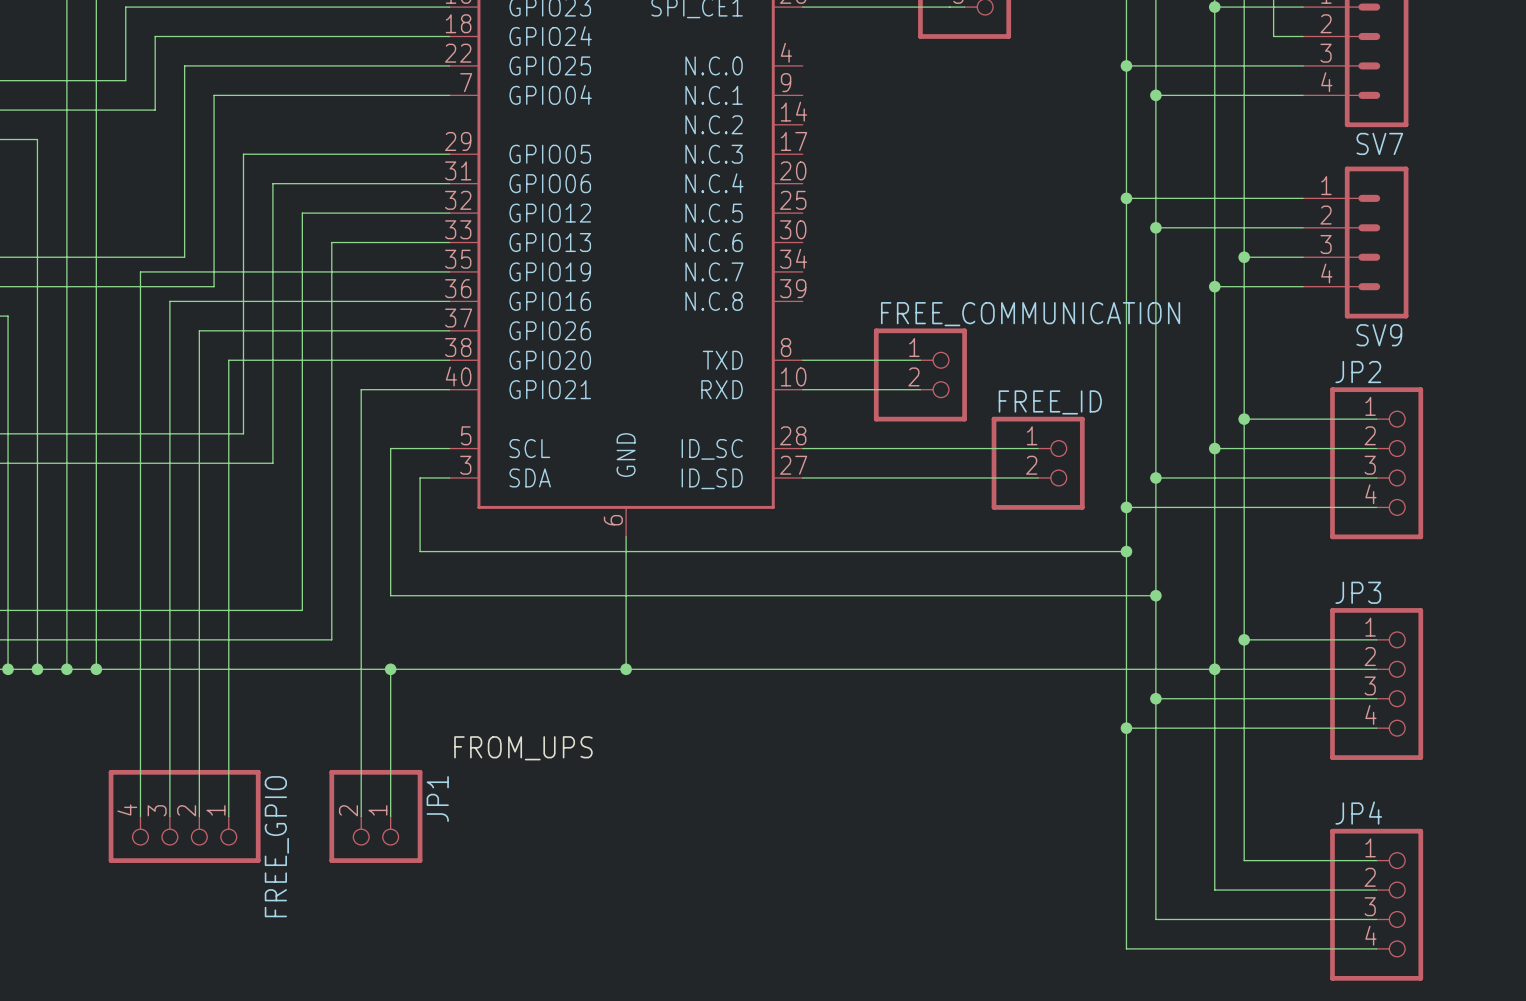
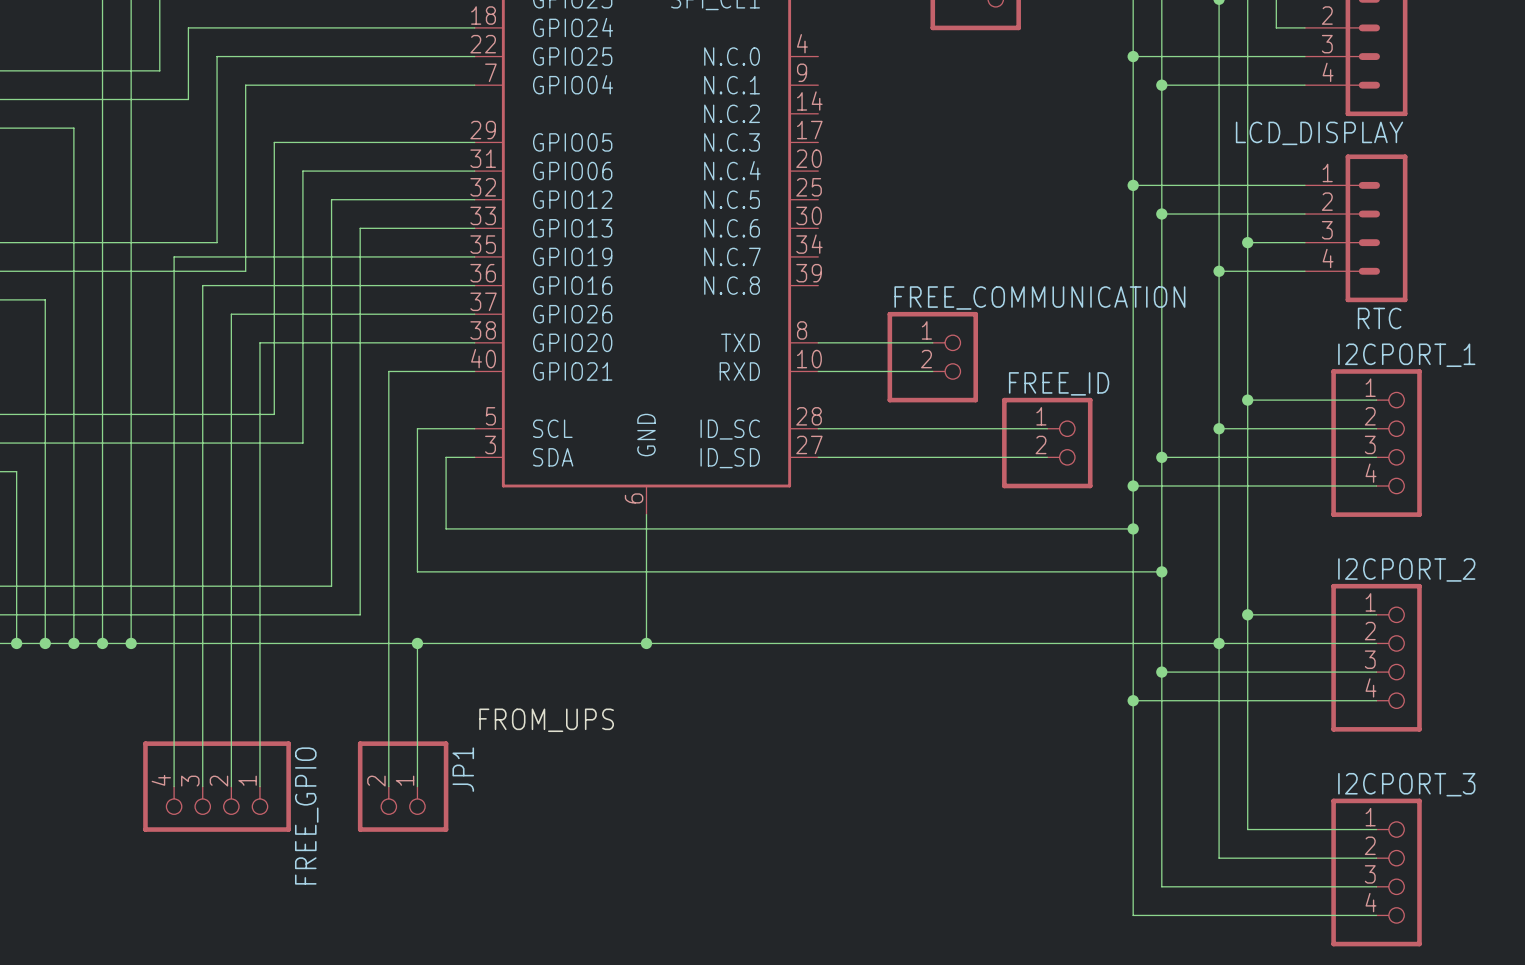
SV7 name: SV7 (1379, 143) -> LCD_DISPLAY (1319, 133)
SV9 name: SV9 (1379, 335) -> RTC (1379, 318)
JP2 name: JP2 (1358, 372) -> I2CPORT_1 (1406, 355)
JP3 name: JP3 (1358, 592) -> I2CPORT_2 (1406, 569)
JP4 name: JP4 (1358, 813) -> I2CPORT_3 (1406, 784)

